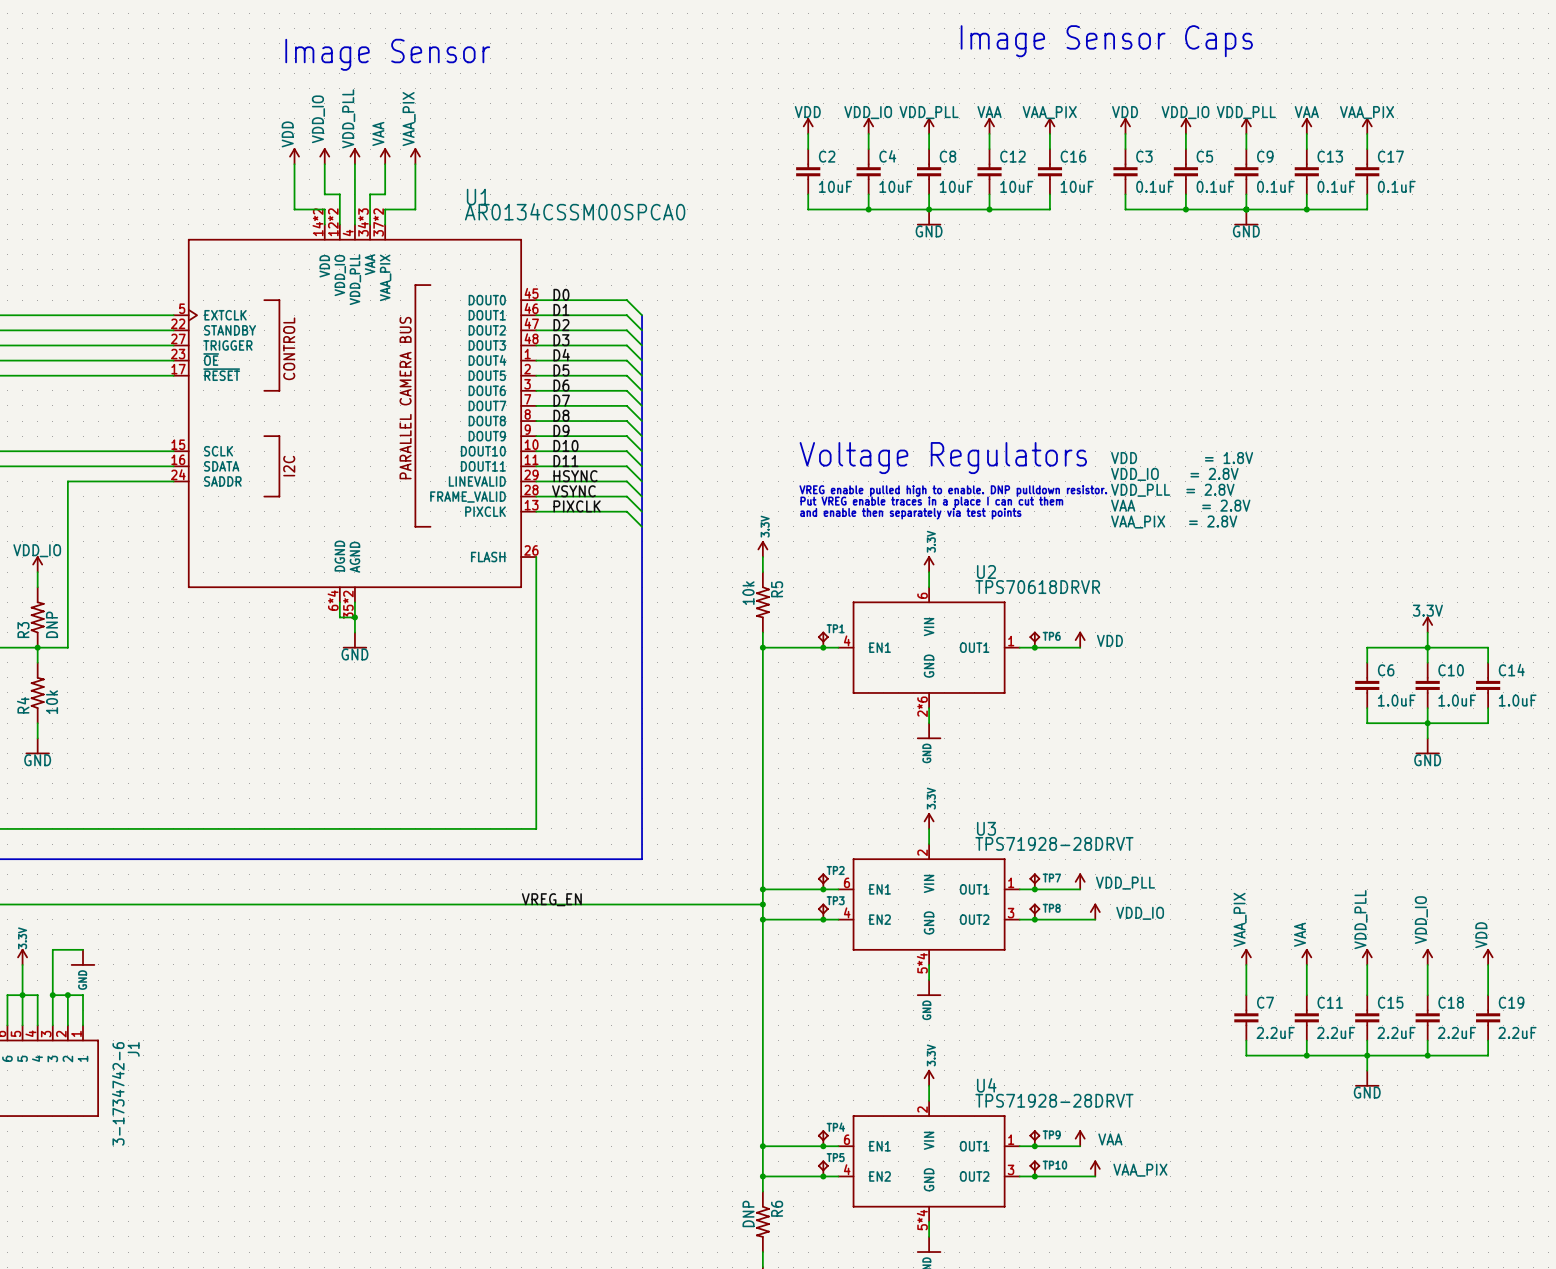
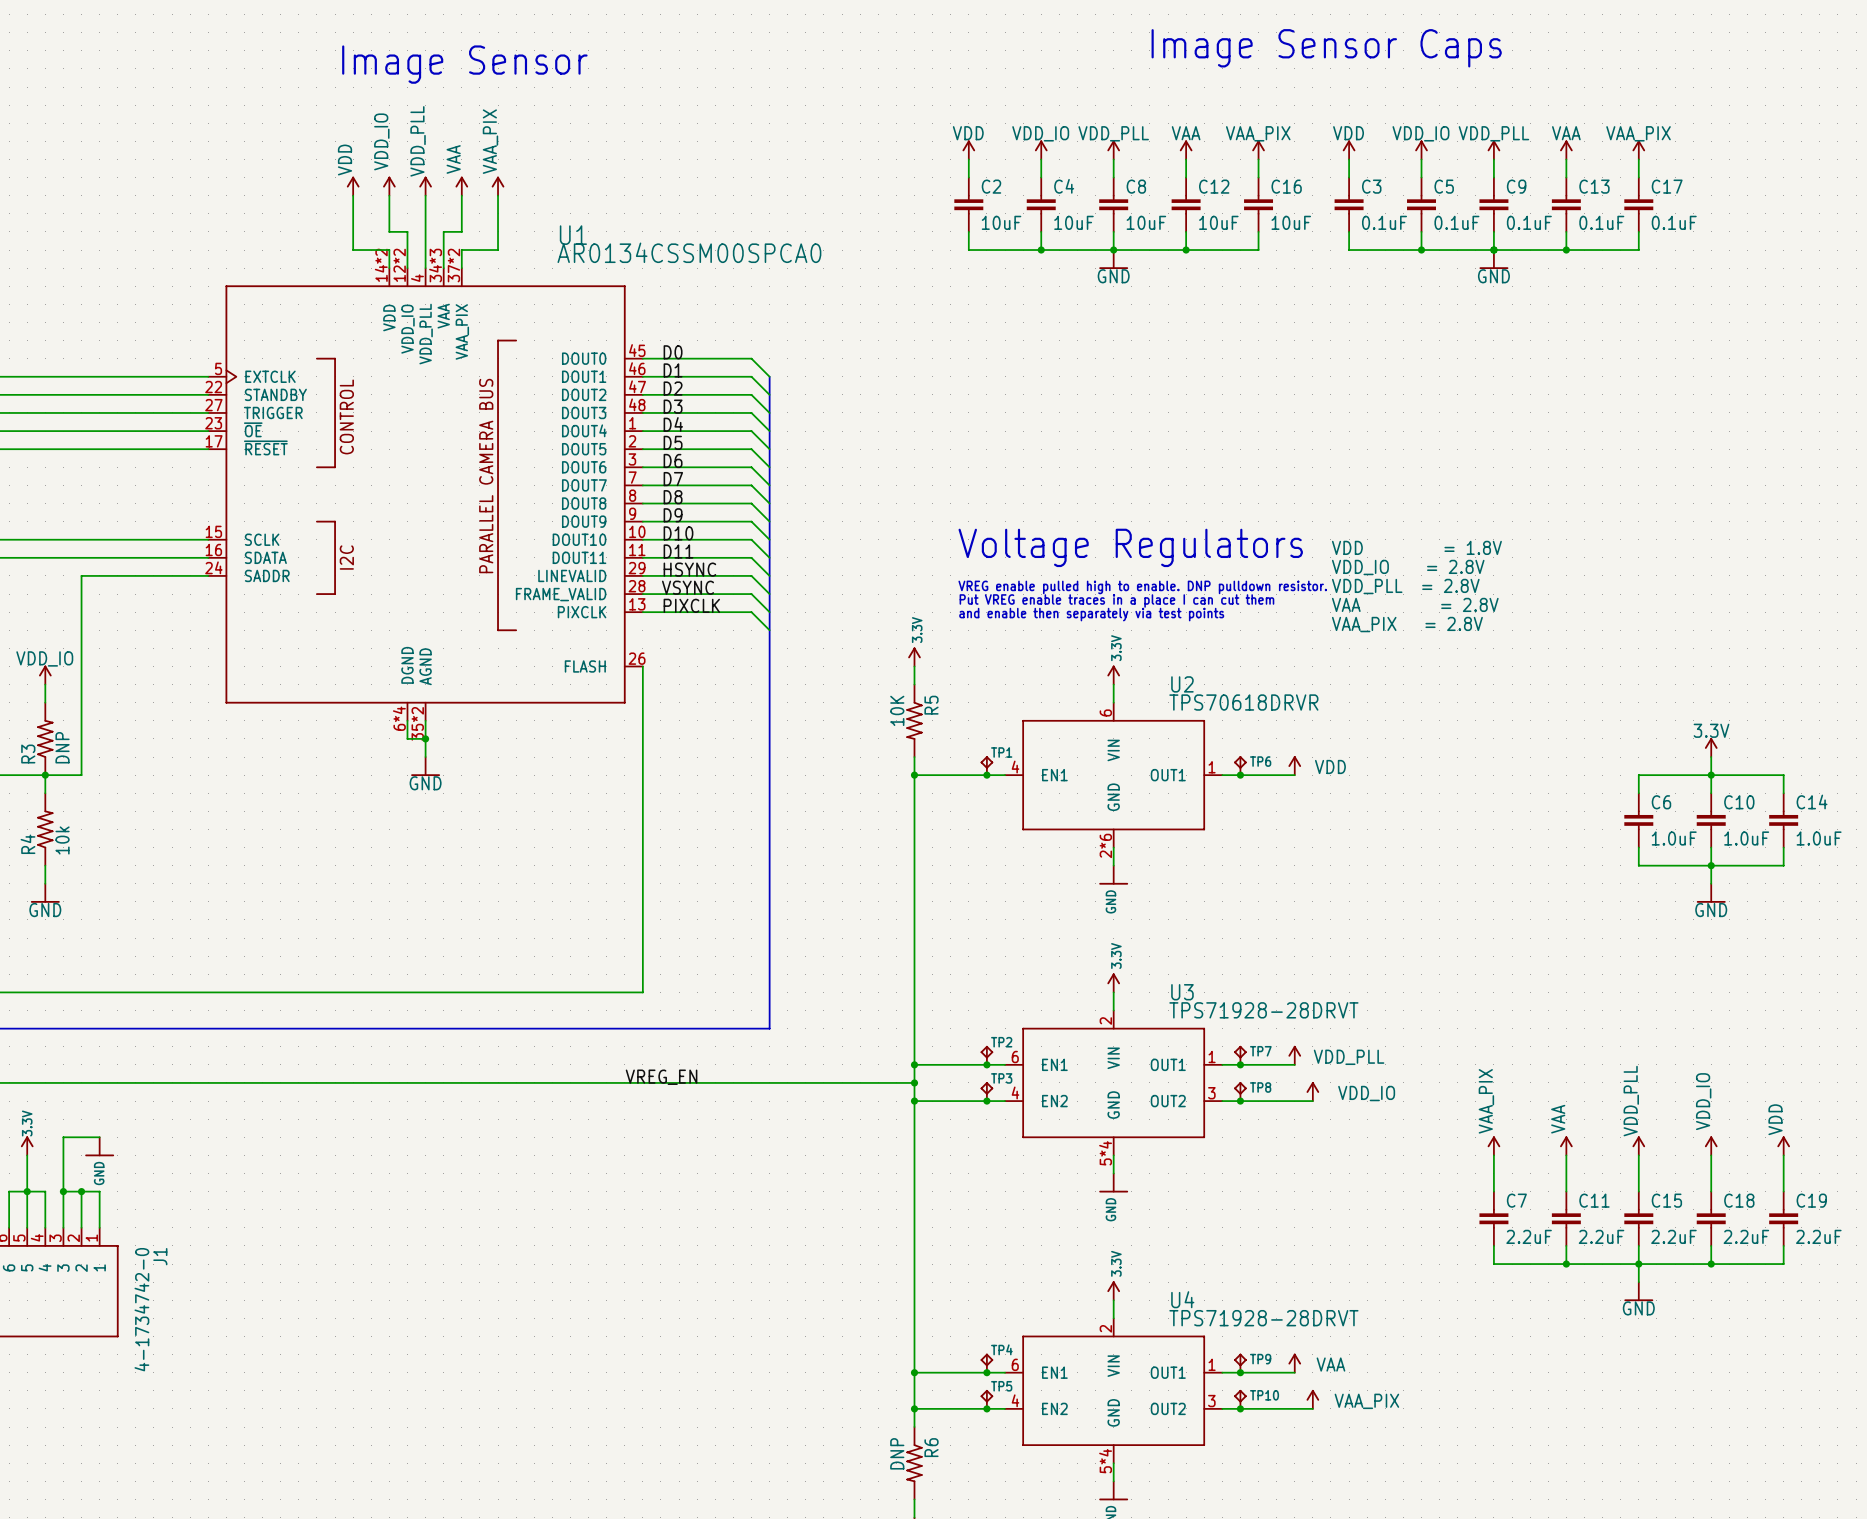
R5 value: 10k (748, 593) -> 10K (897, 710)
J1 value: 3-1734742-6 (118, 1093) -> 4-1734742-0 (141, 1309)

